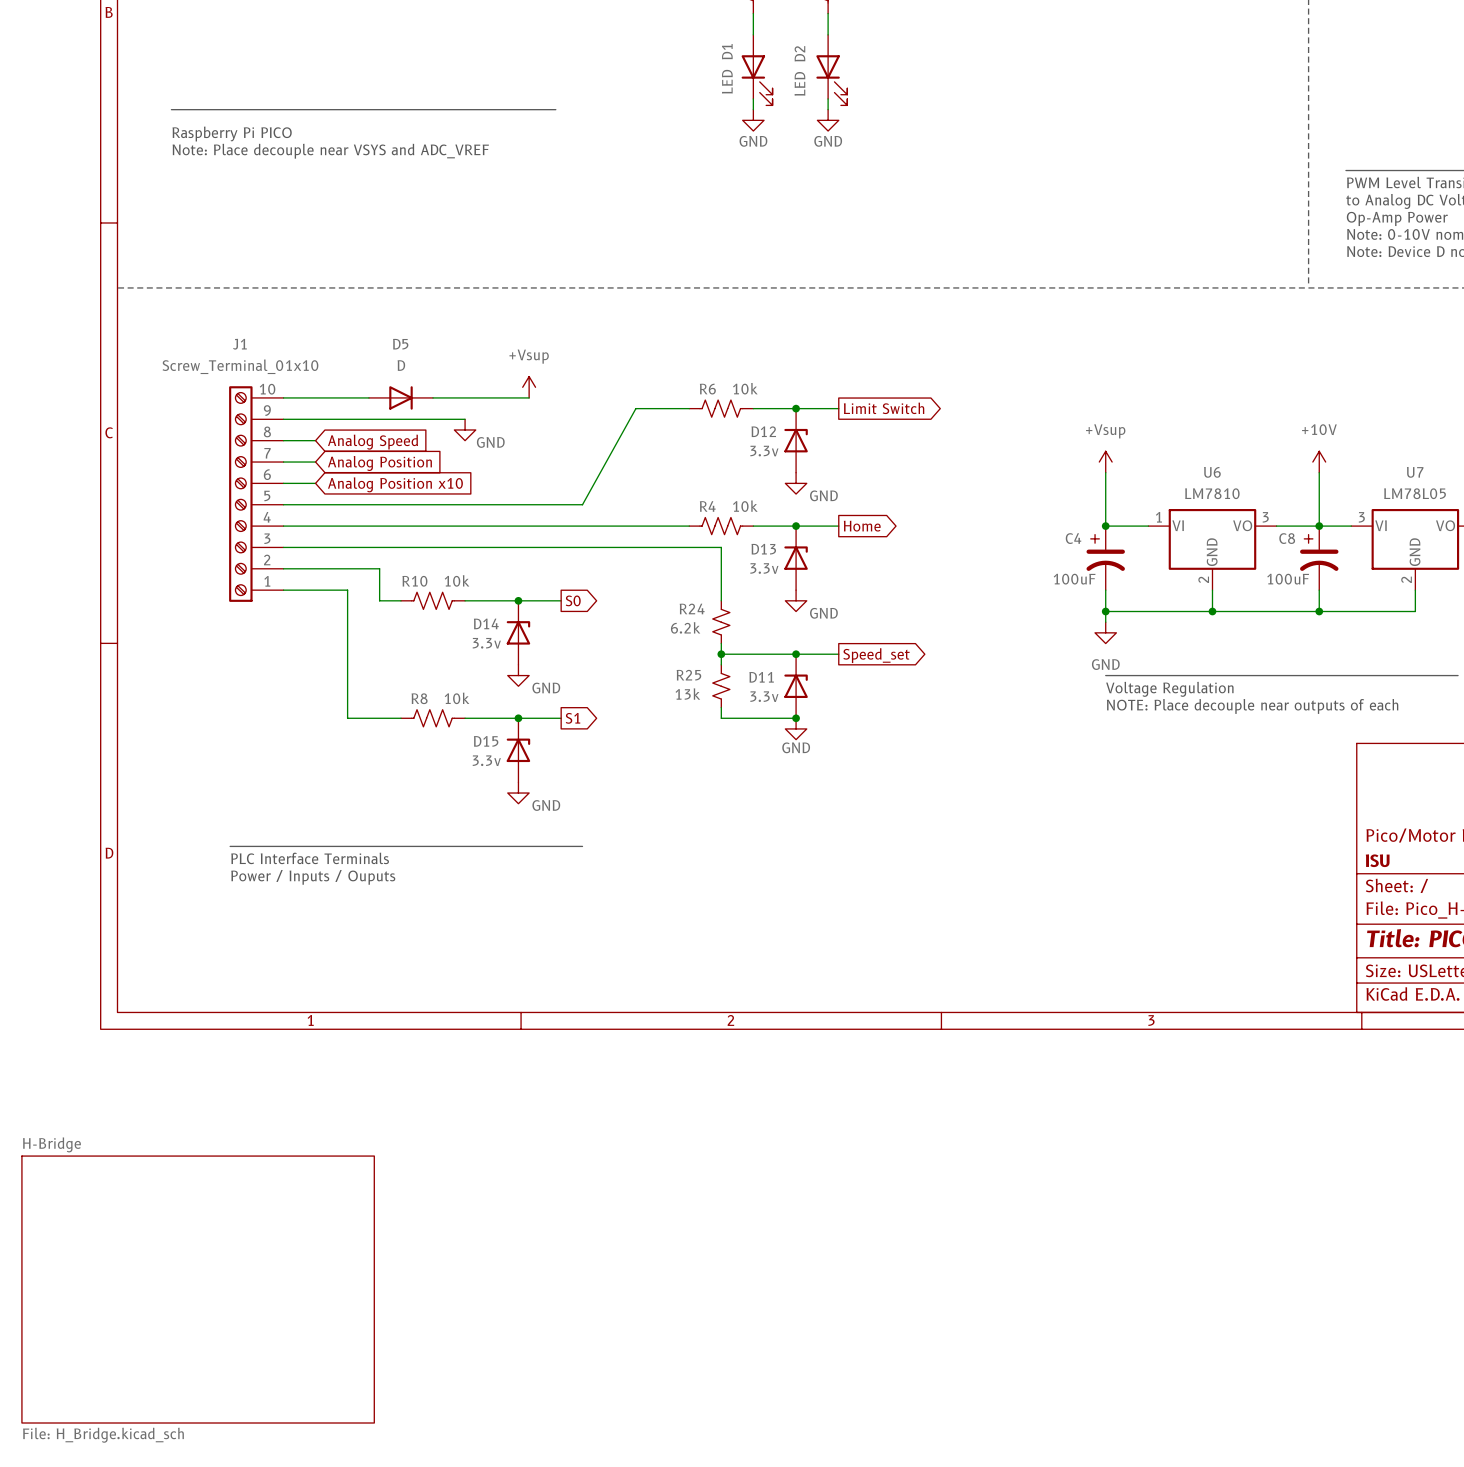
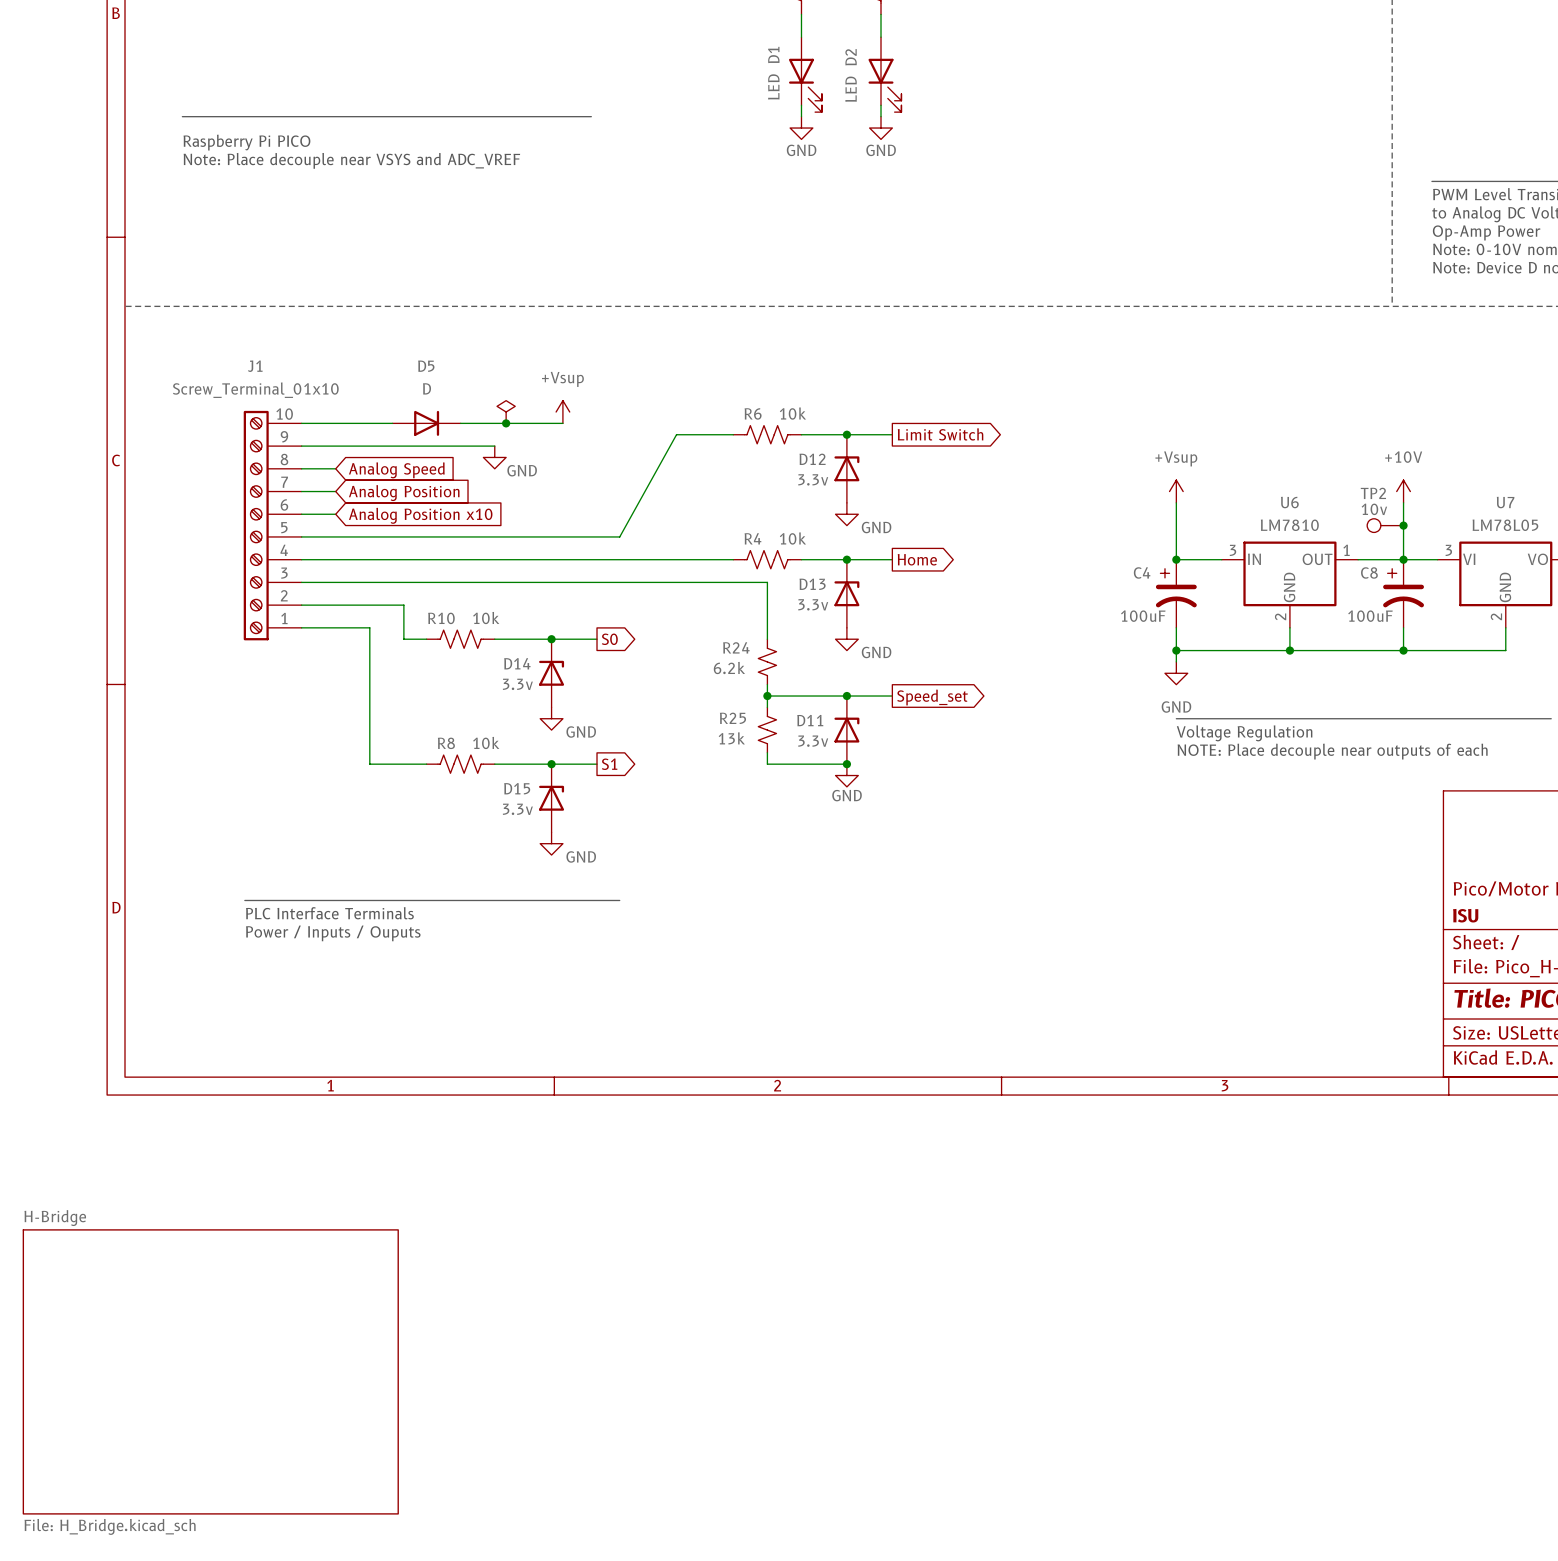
power symbol: none -> (506, 412)
junction: none -> (506, 423)
TP2: none -> 10v (1385, 525)
junction: none -> (1403, 525)
U6 pin number: 1 (1158, 517) -> 3 (1232, 550)
U6 pin number: 3 (1265, 517) -> 1 (1346, 550)
U6 pin name: VI (1178, 525) -> IN (1254, 559)
U6 pin name: VO (1242, 525) -> OUT (1317, 559)

